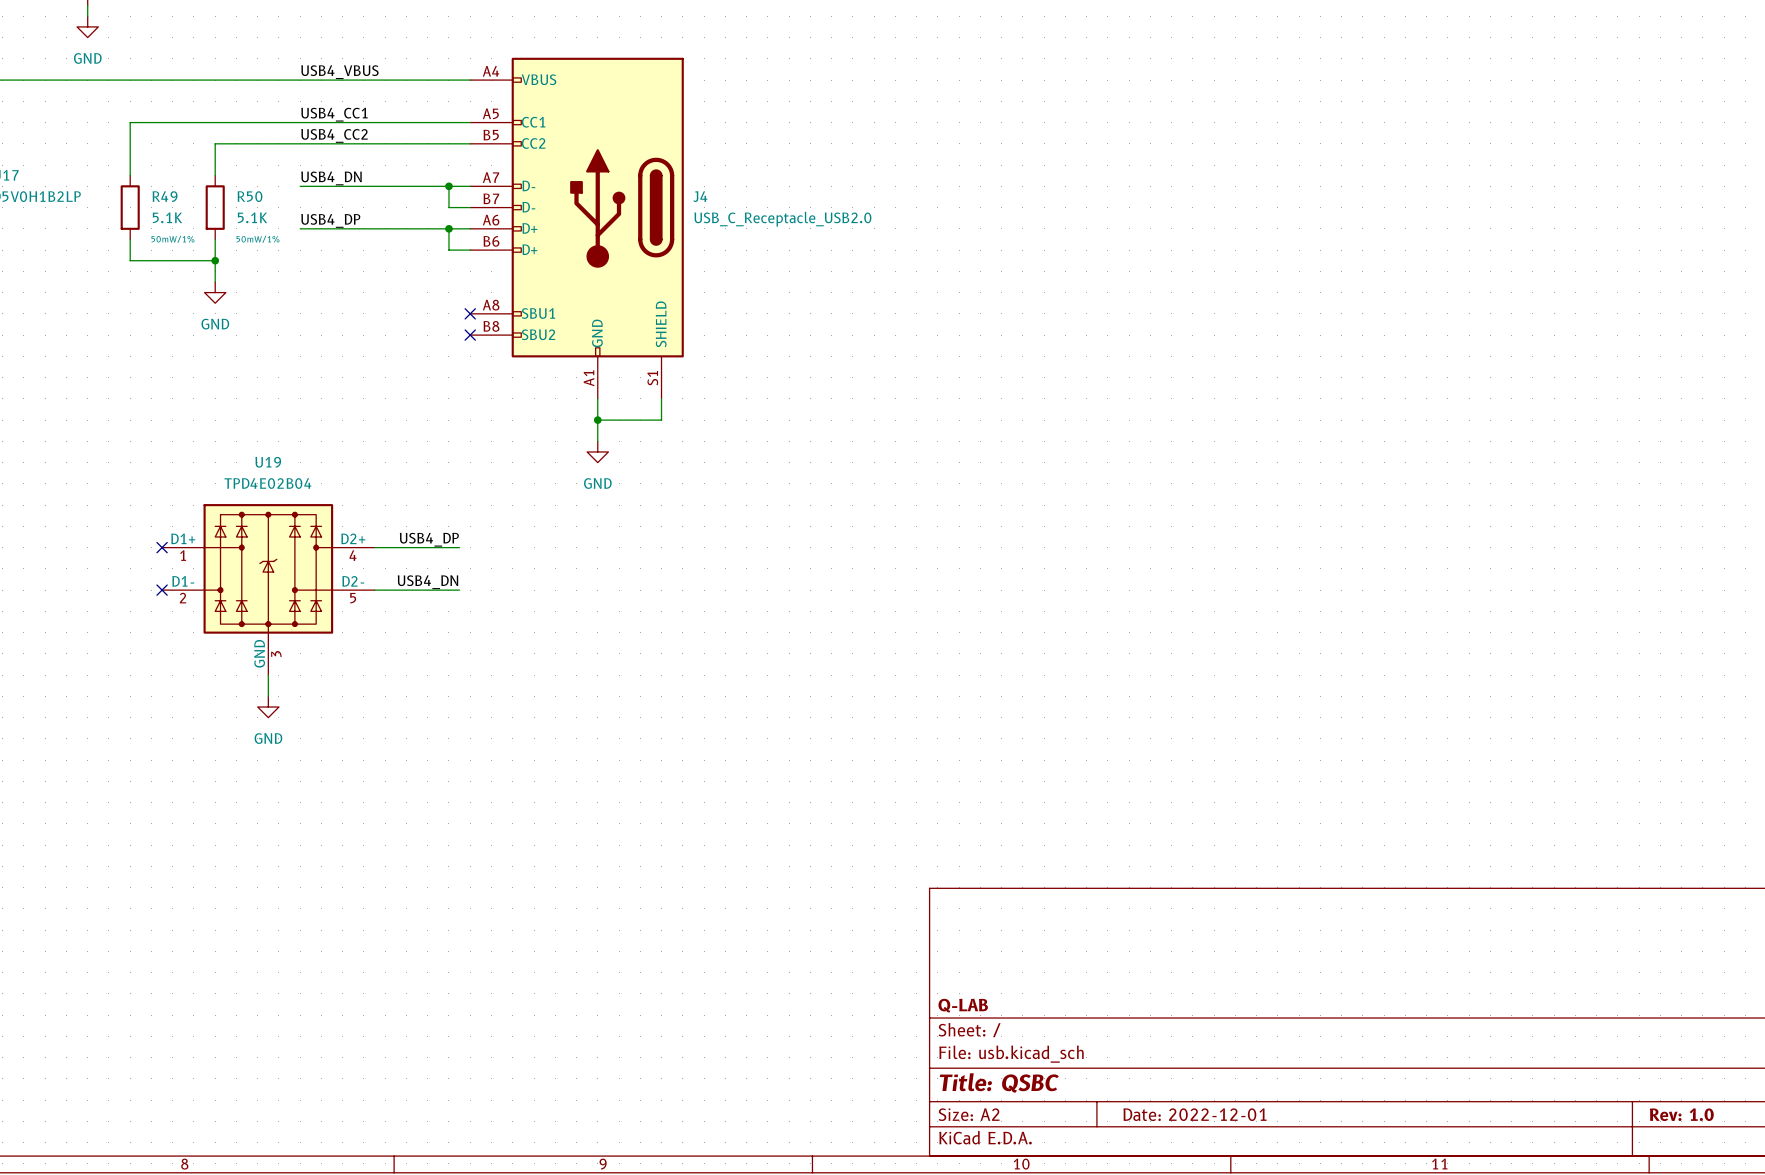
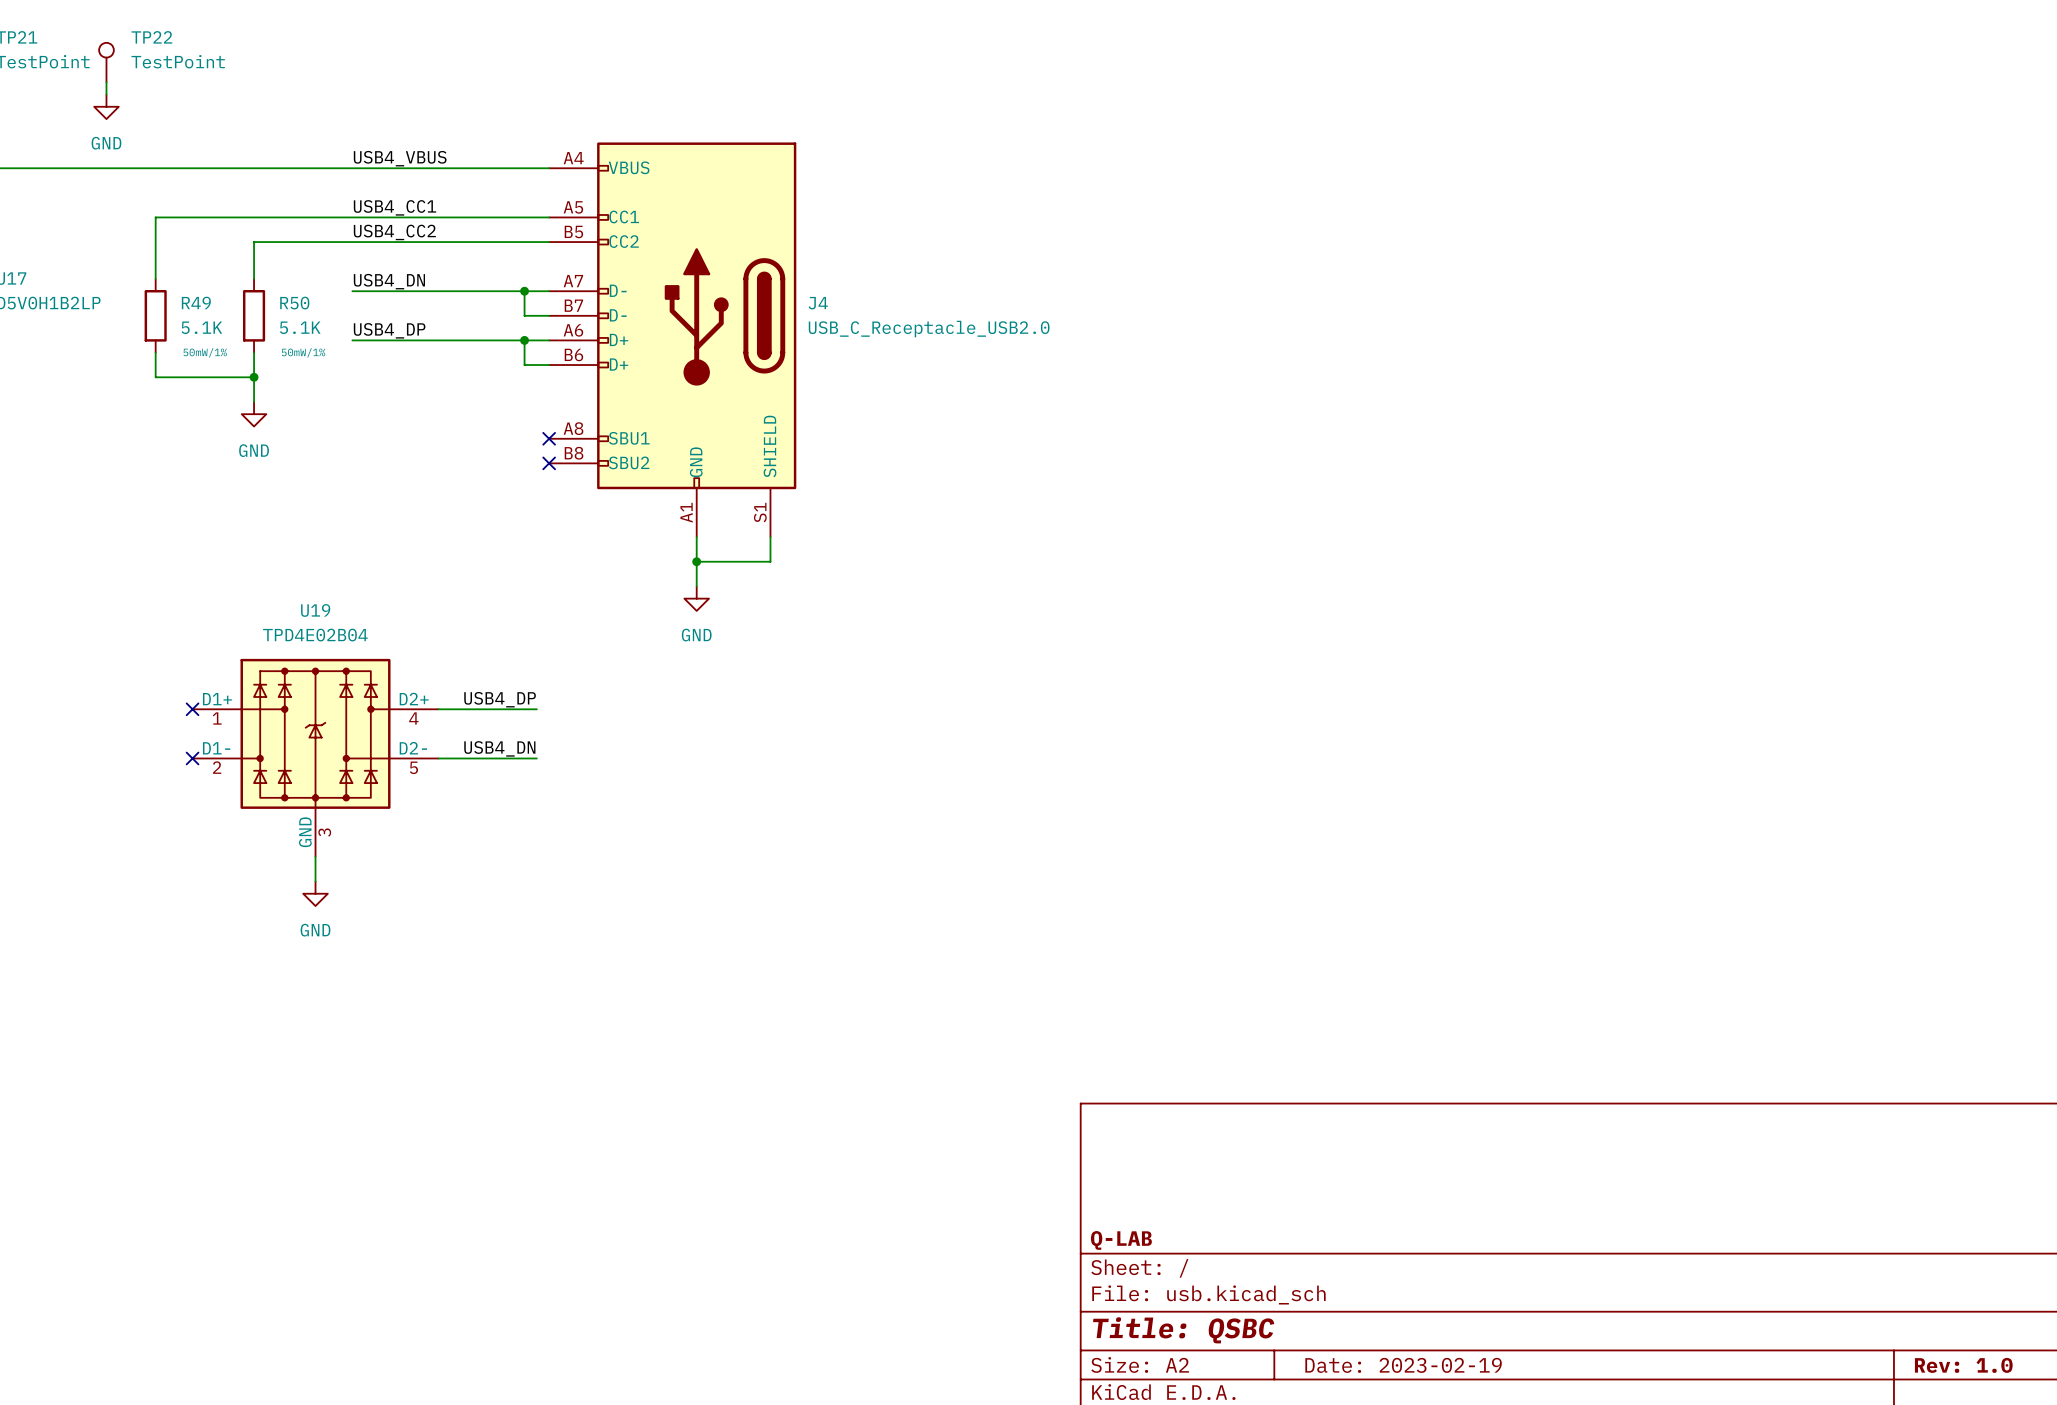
title block: Date: 2022-12-01 (1194, 1114) -> Date: 2023-02-19 (1403, 1365)

